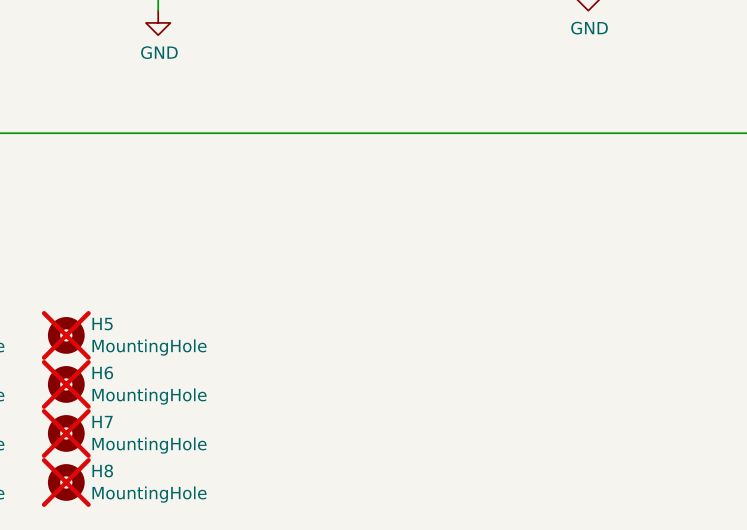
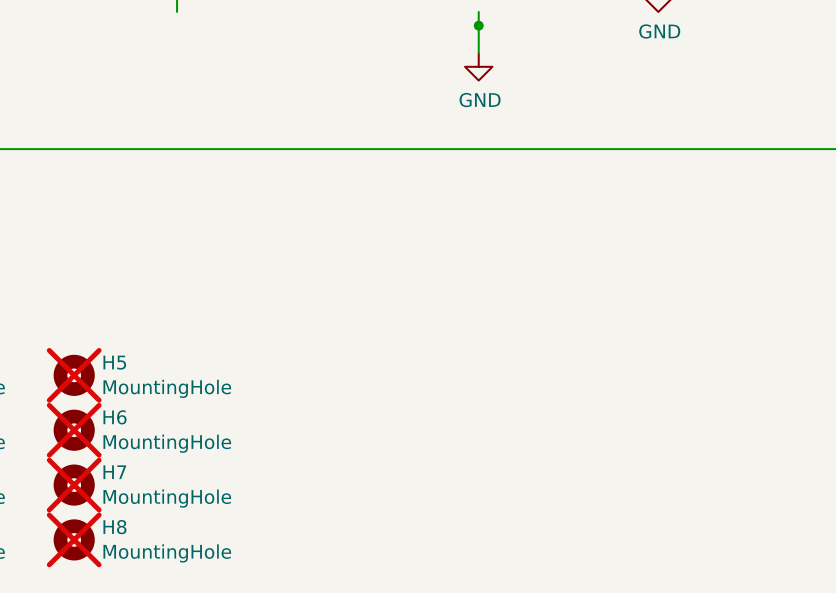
wire: none -> (478, 11) (478, 53)
power symbol: GND (158, 22) -> none
junction: none -> (478, 25)
power symbol: none -> GND (478, 66)

